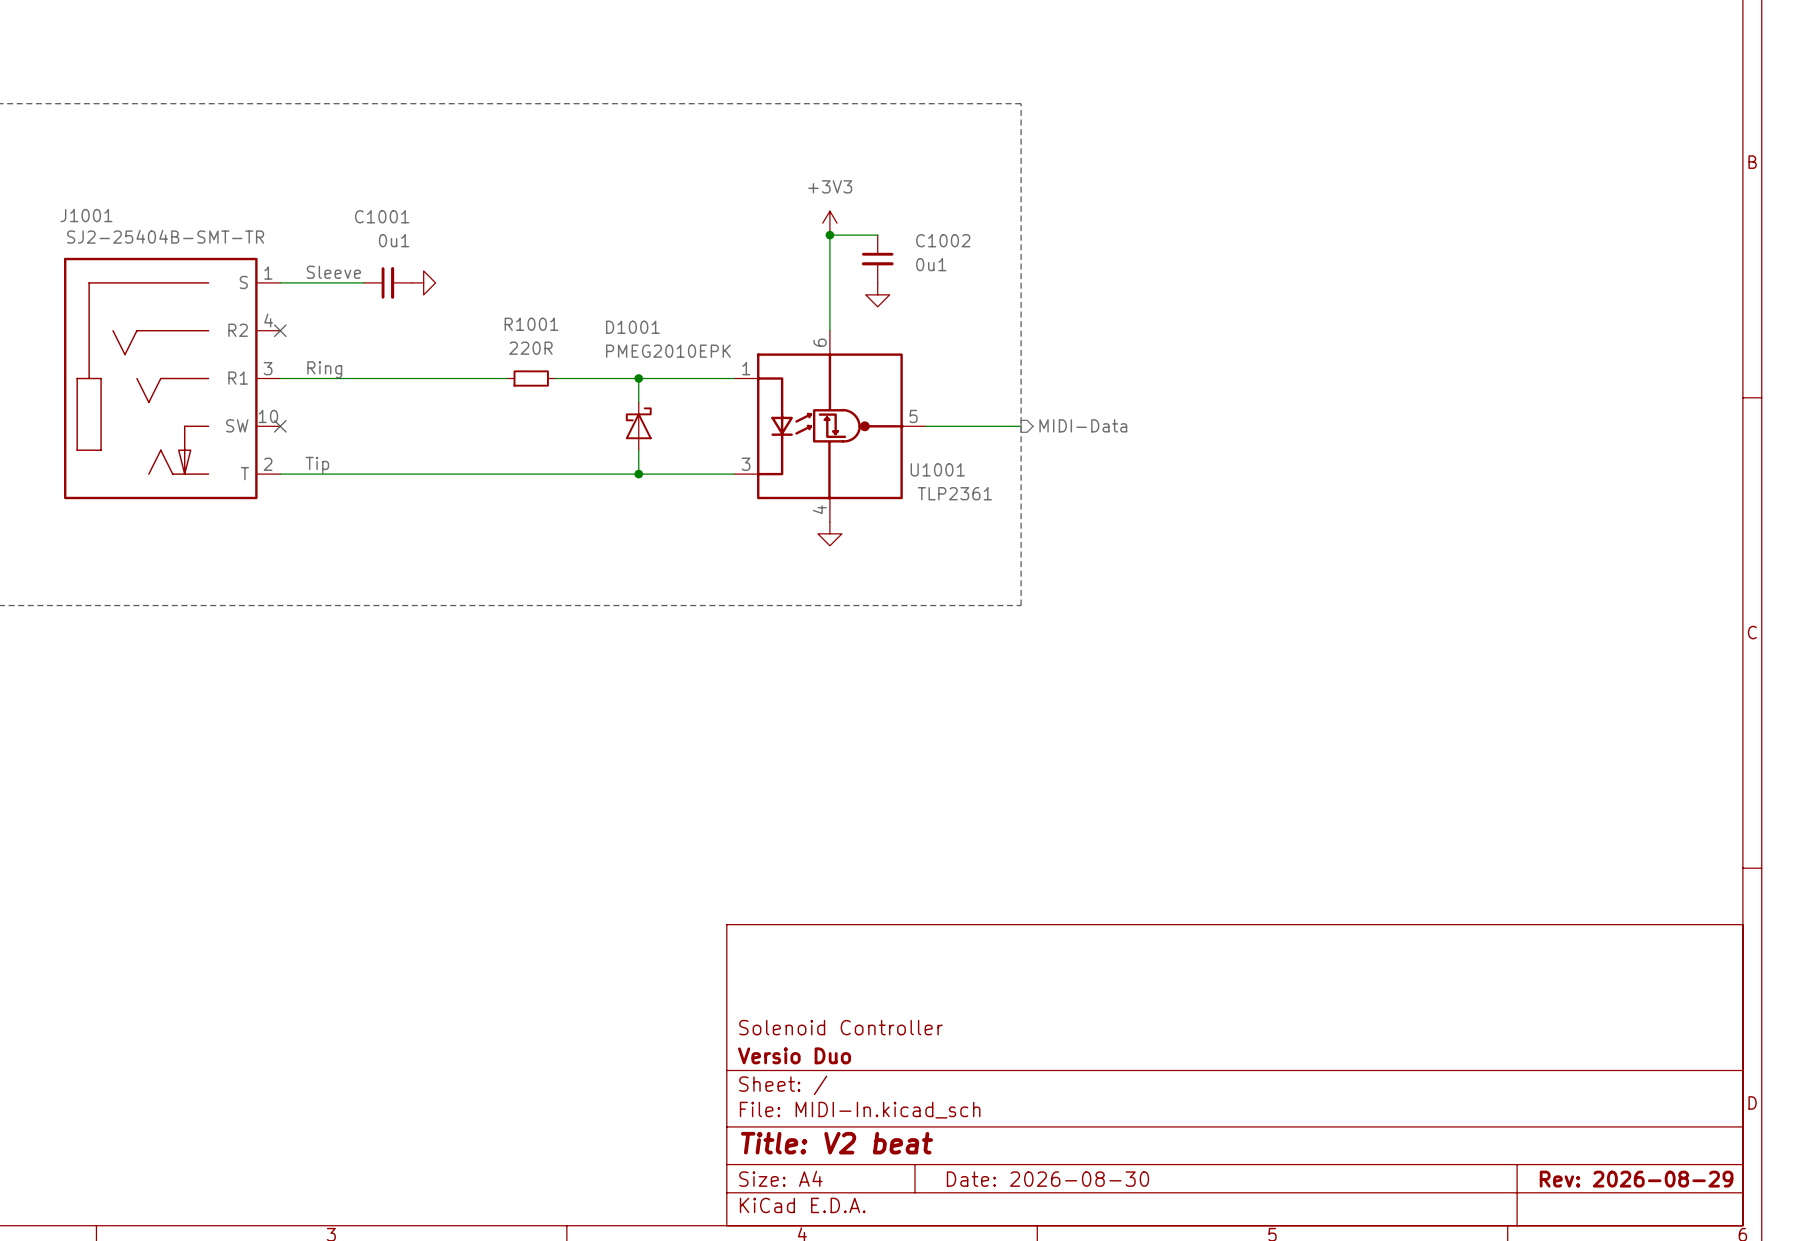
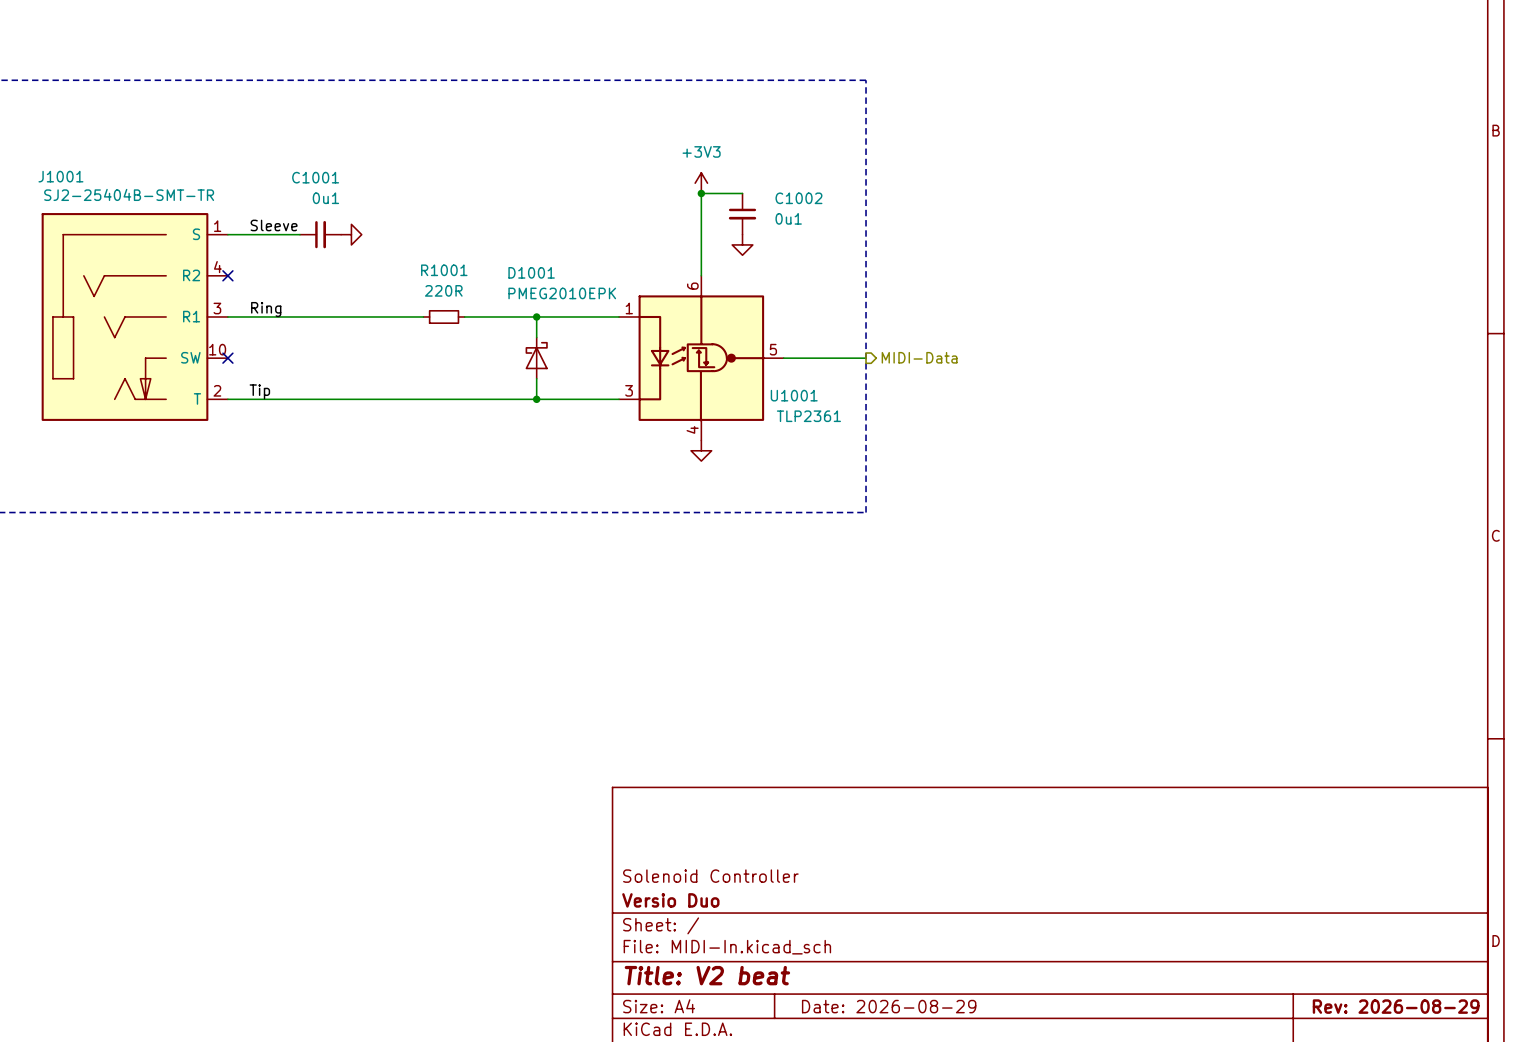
title block: Date: 2026-08-30 (1047, 1179) -> Date: 2026-08-29 (889, 1006)

